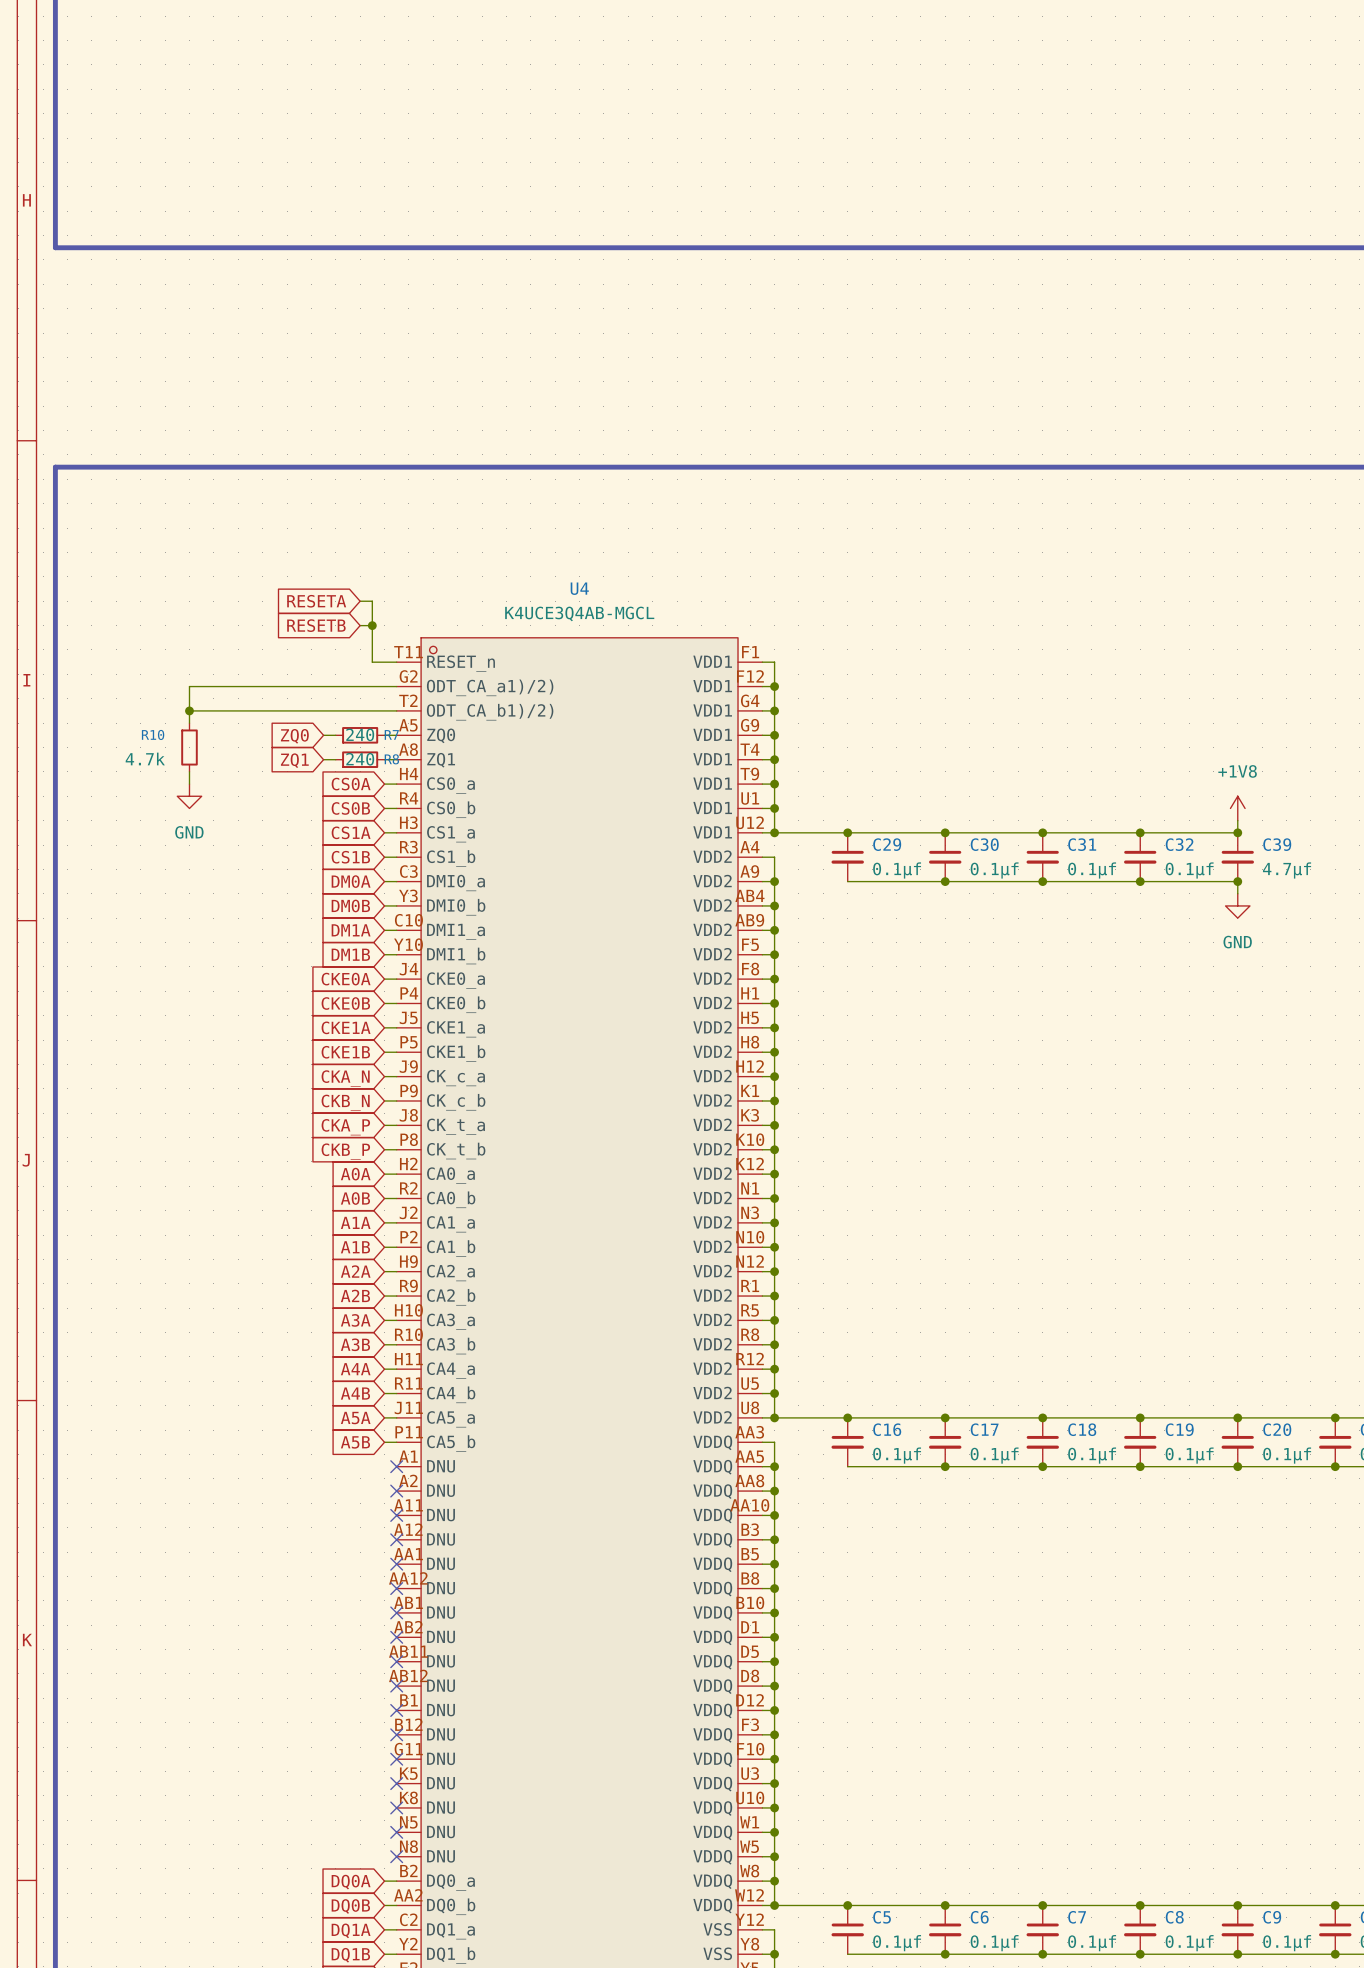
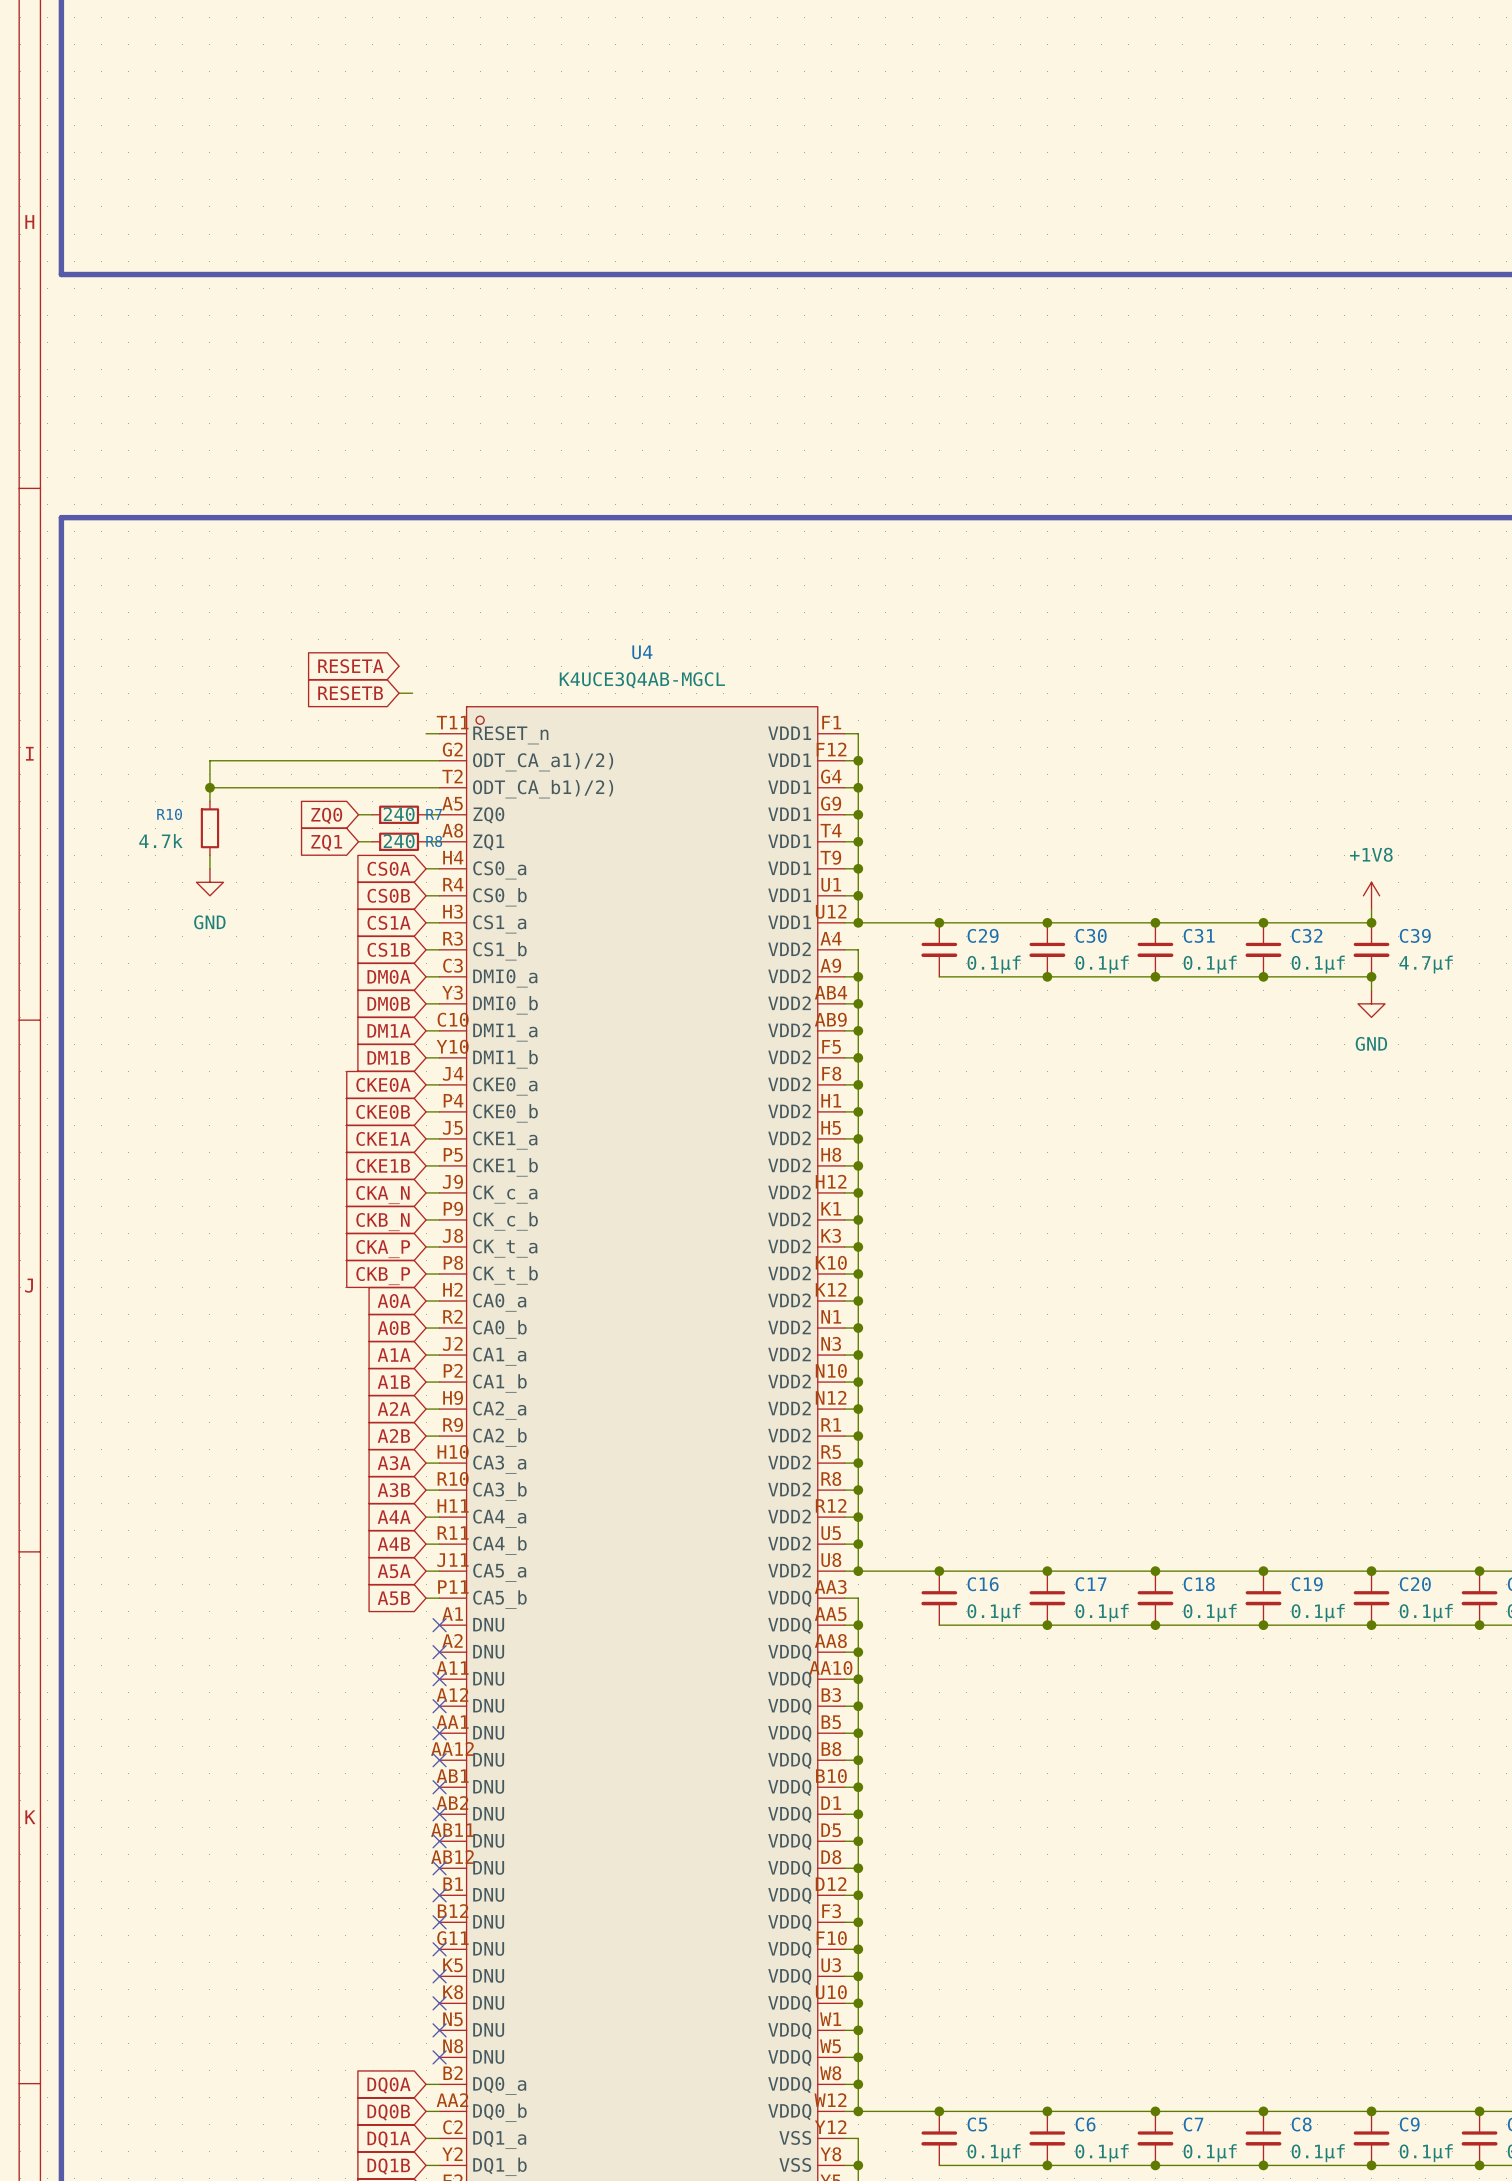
wire: (360, 601) (372, 601) (372, 662) (384, 662) -> none
junction: (372, 625) -> none

